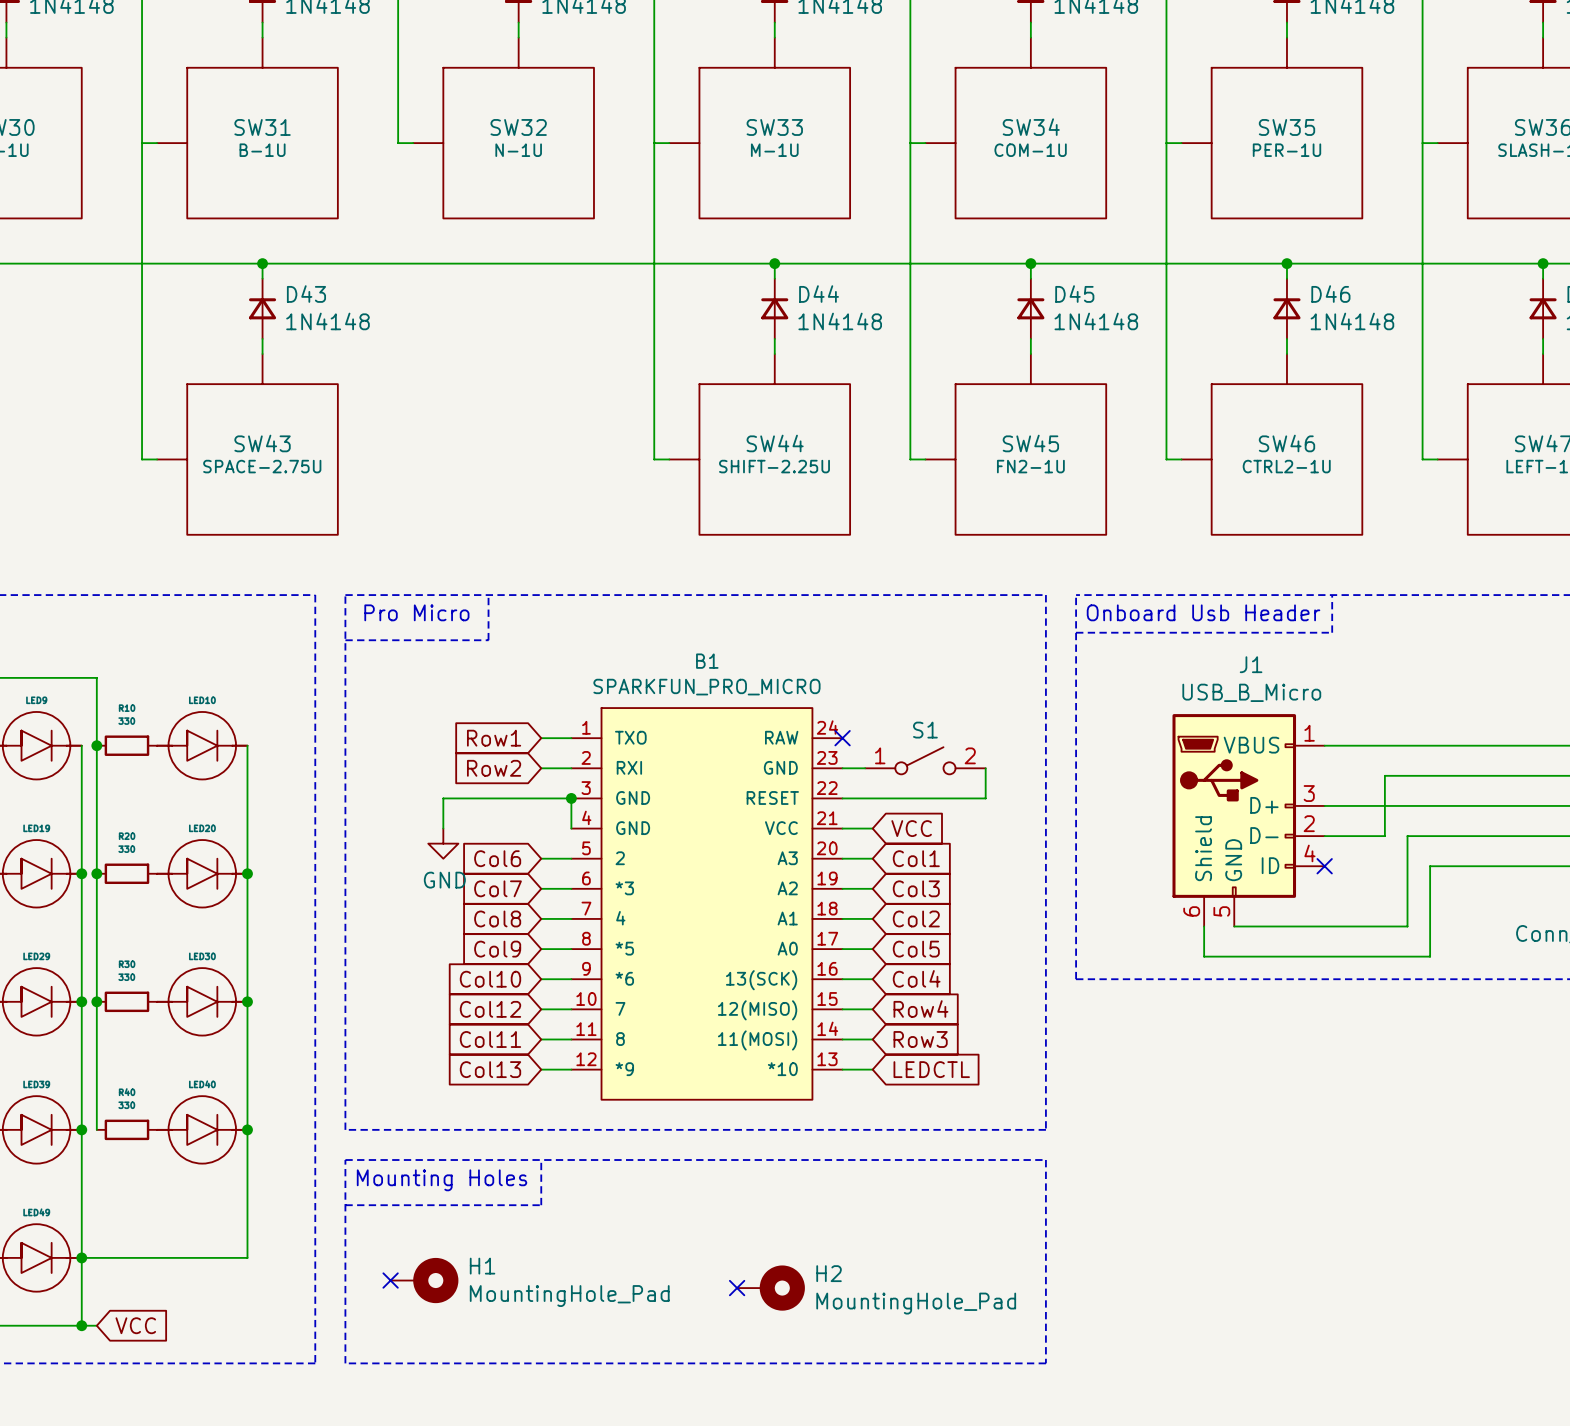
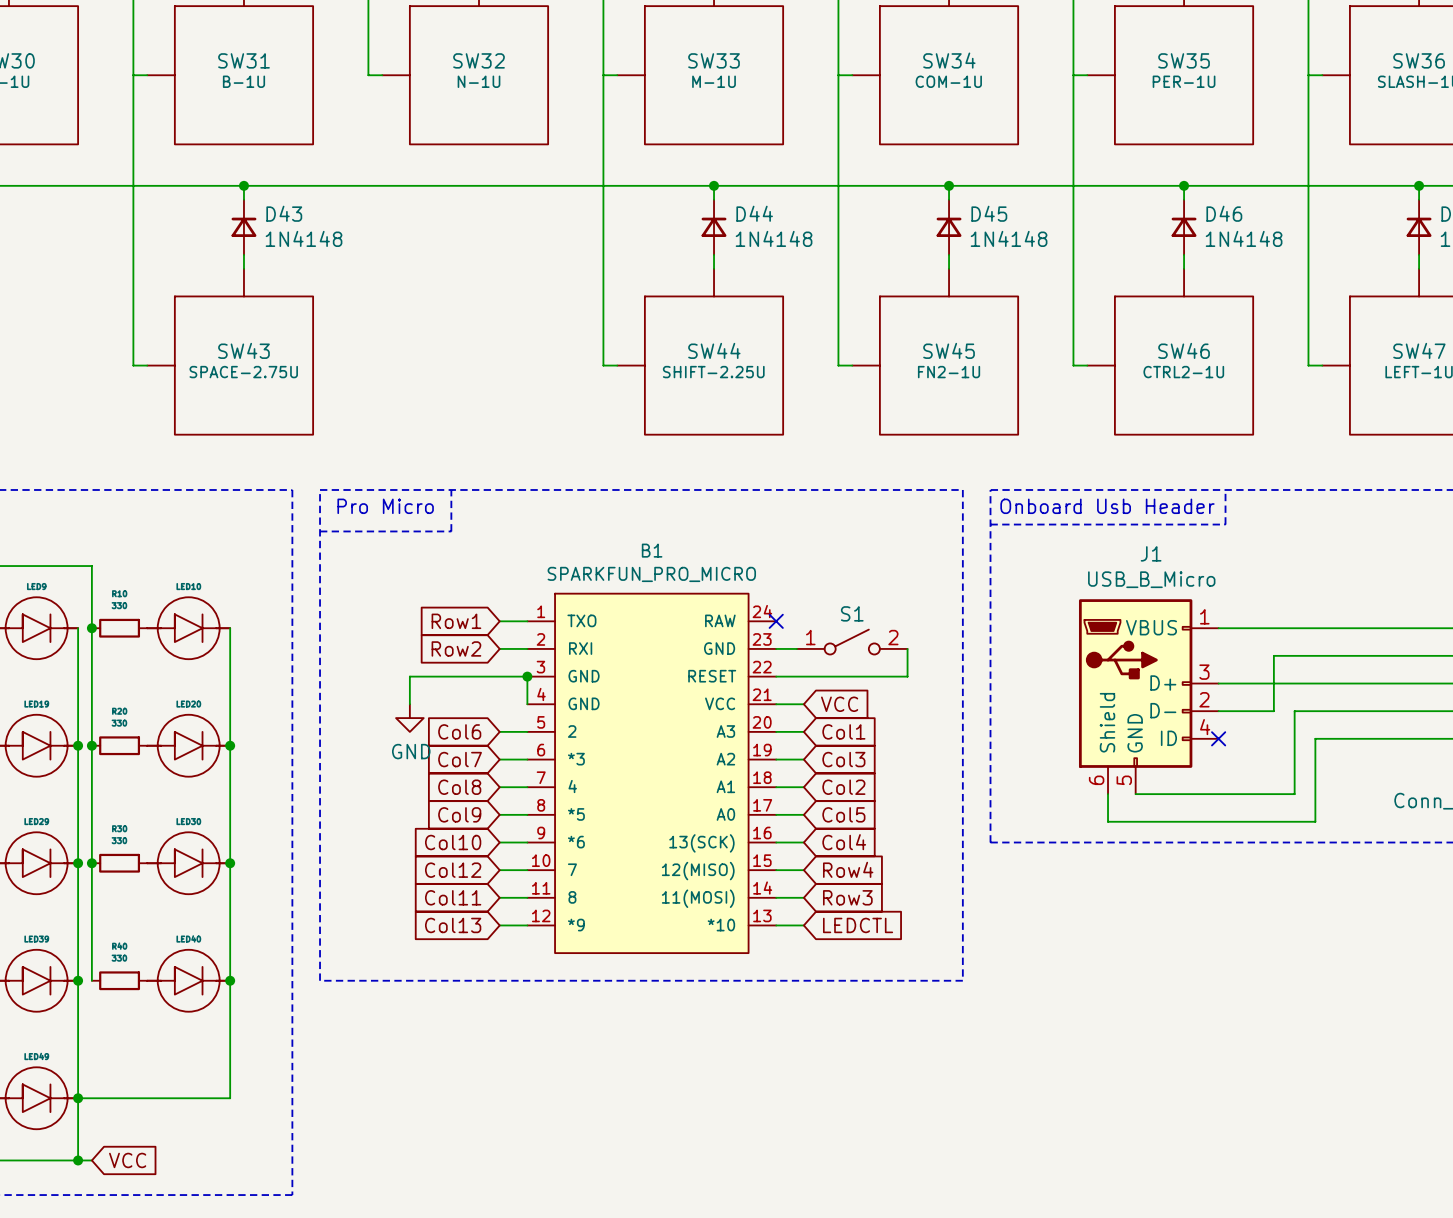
line: (345, 1160) (1045, 1160) (1045, 1363) (345, 1363) (345, 1160) -> none
line: (541, 1160) (541, 1205) (345, 1205) -> none
text: Mounting Holes (442, 1180) -> none
no-connect mark: (390, 1280) -> none
H1: MountingHole_Pad (424, 1280) -> none
no-connect mark: (737, 1288) -> none
H2: MountingHole_Pad (771, 1288) -> none

